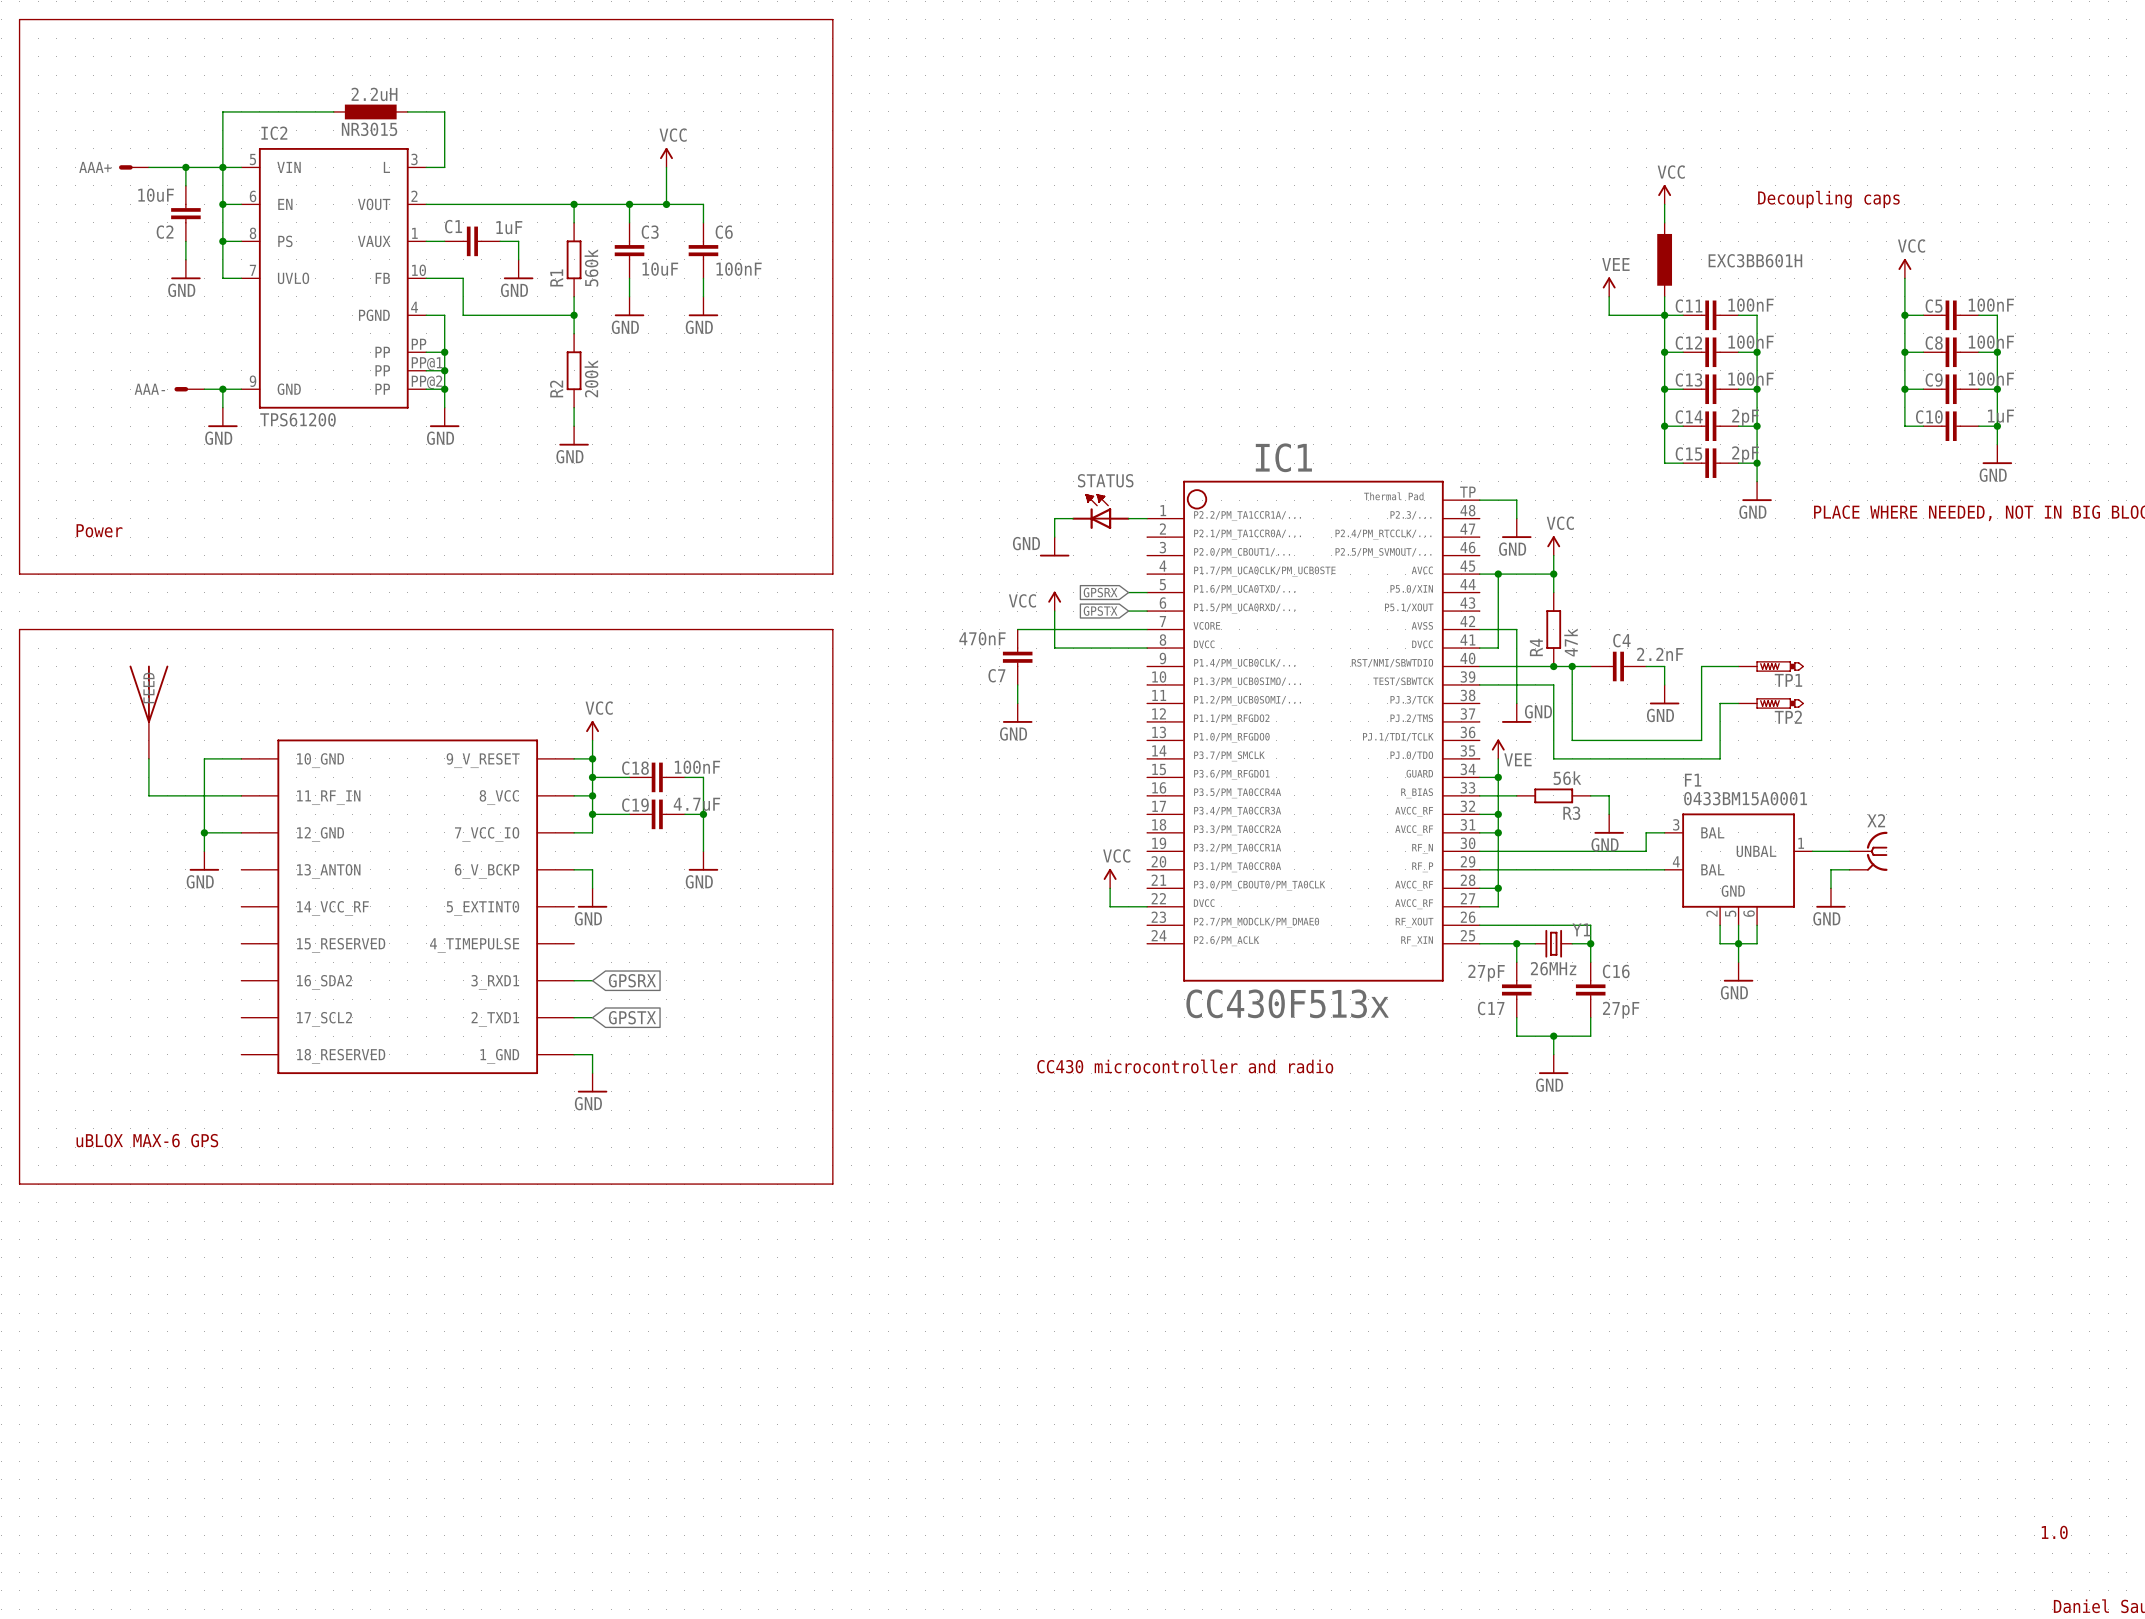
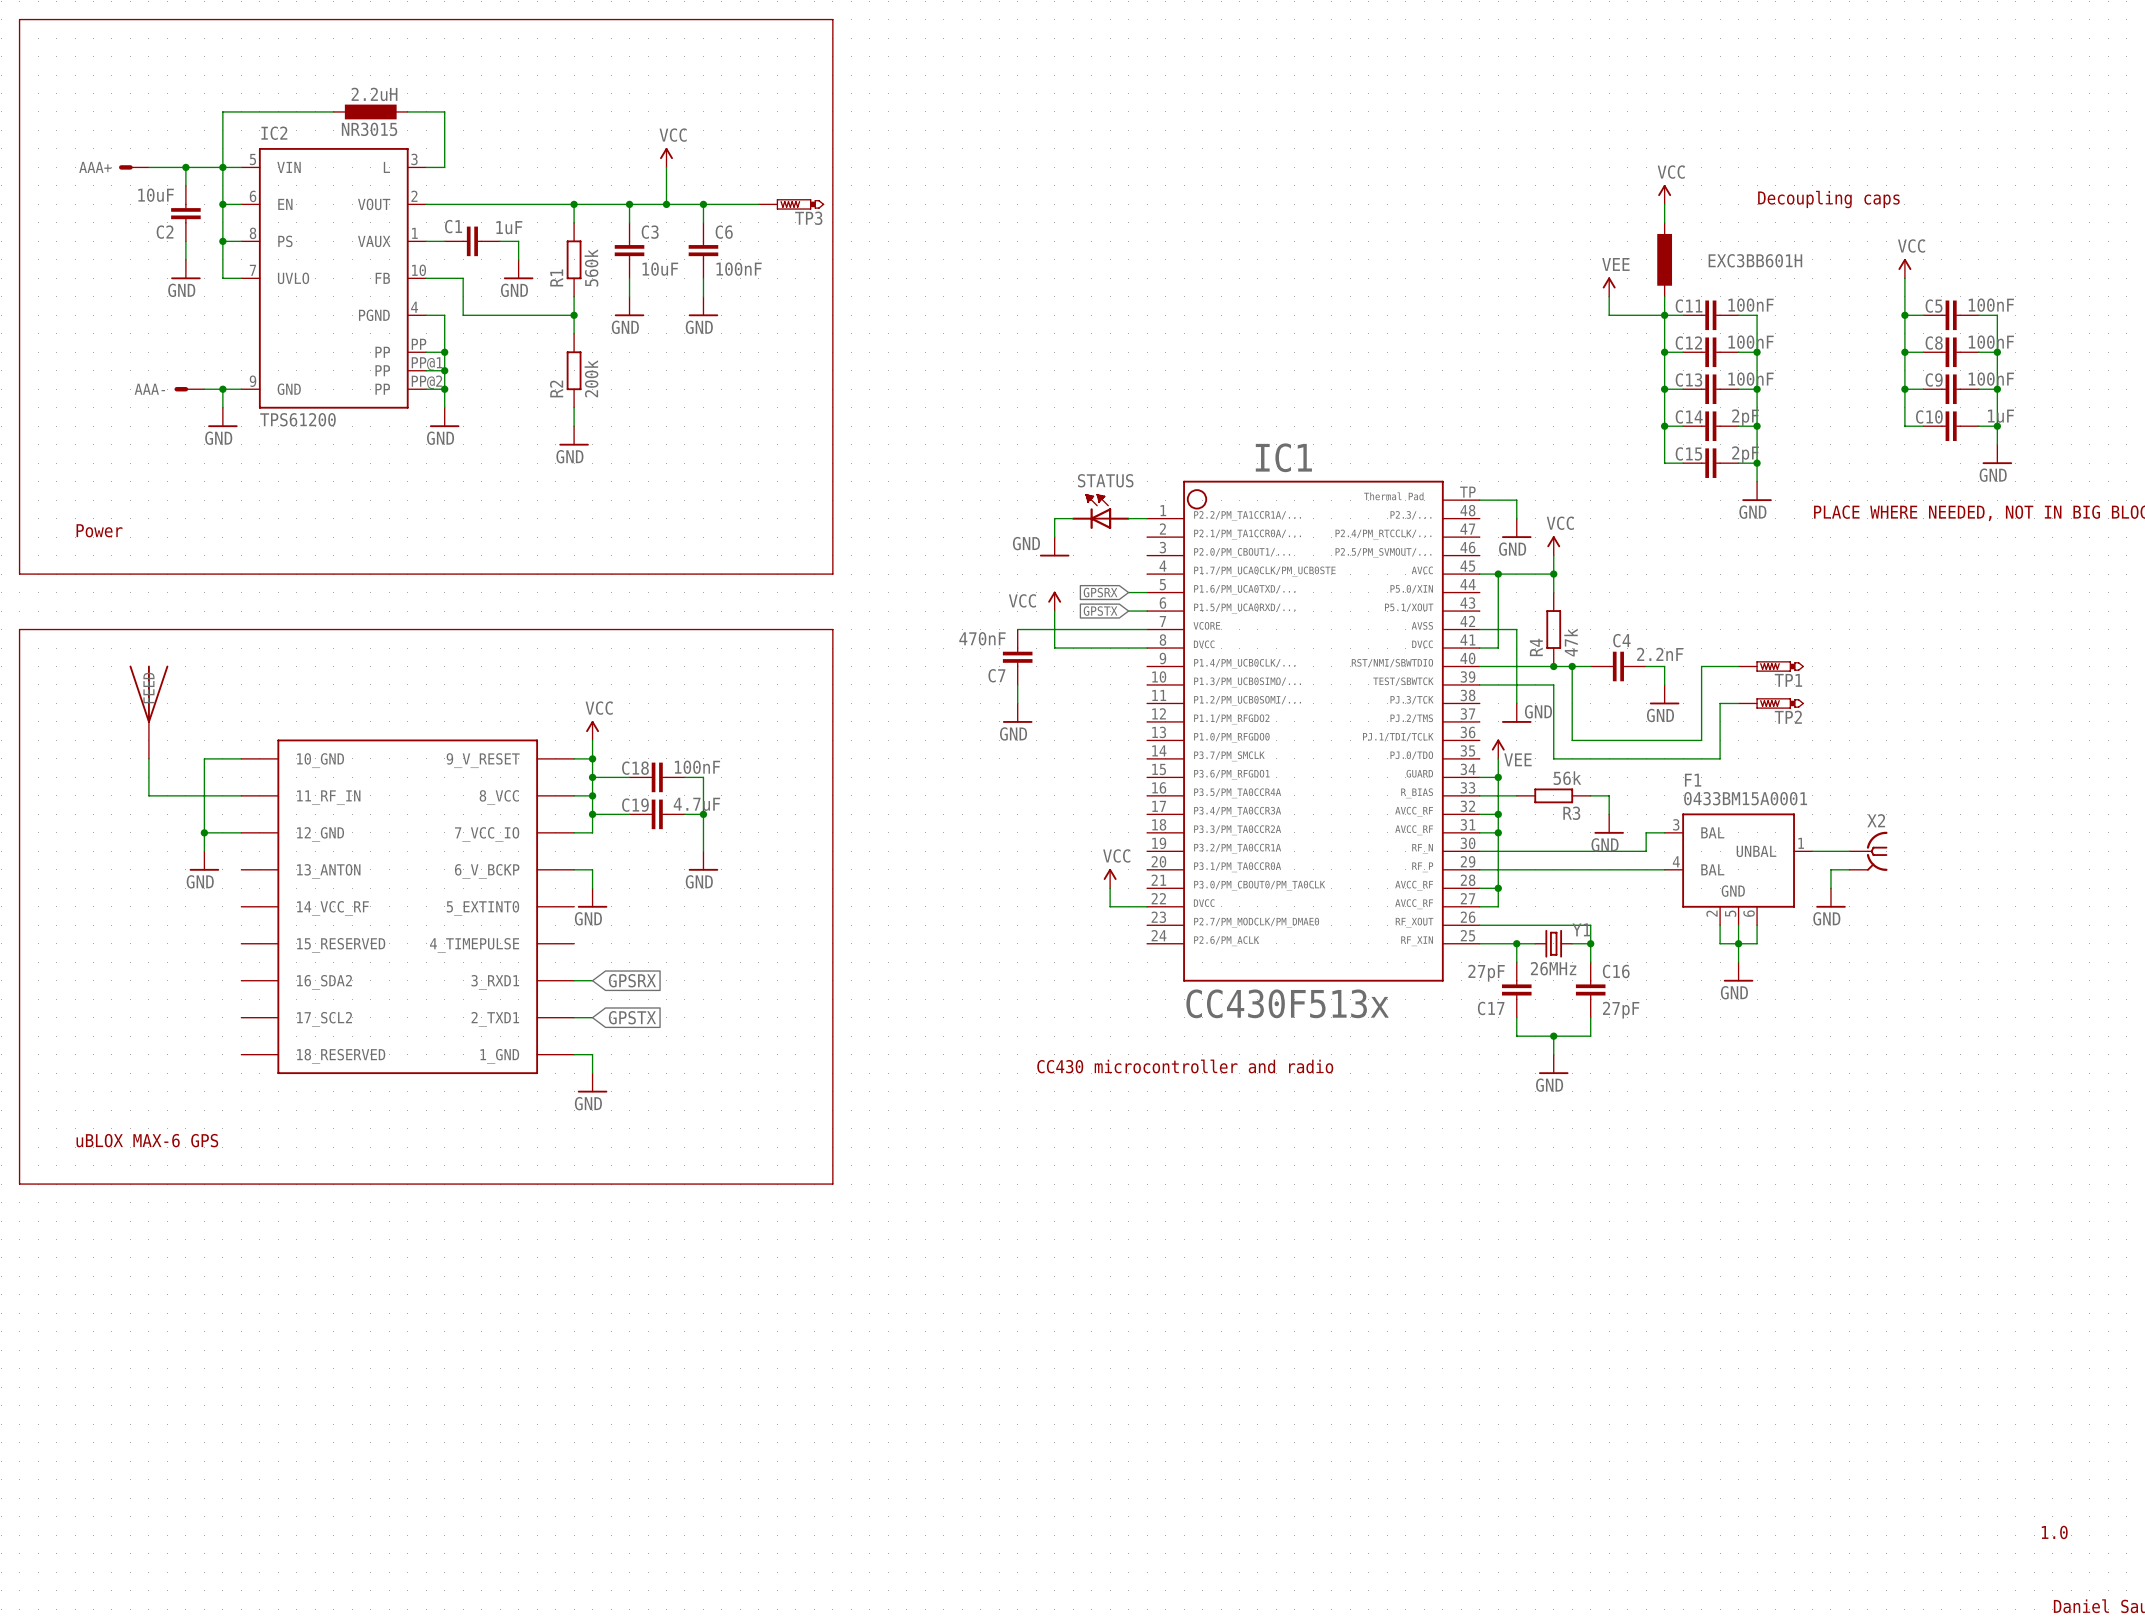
wire: none -> (703, 204) (758, 204)
junction: none -> (703, 204)
TP3: none -> (791, 204)

